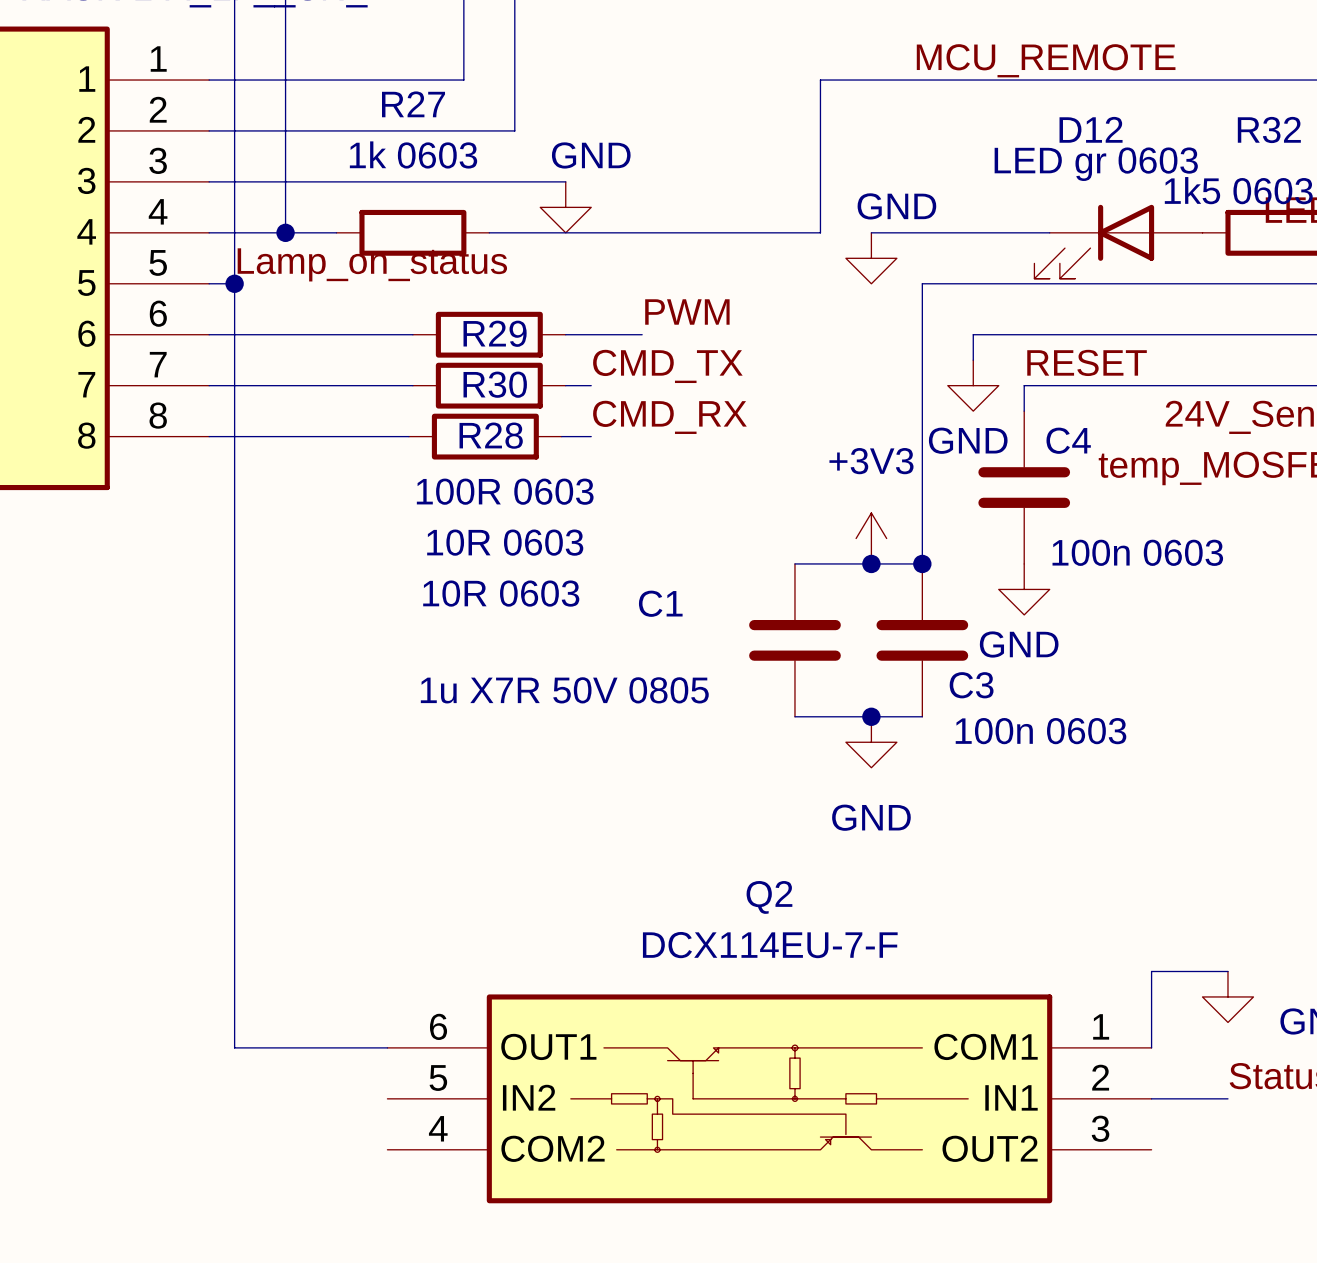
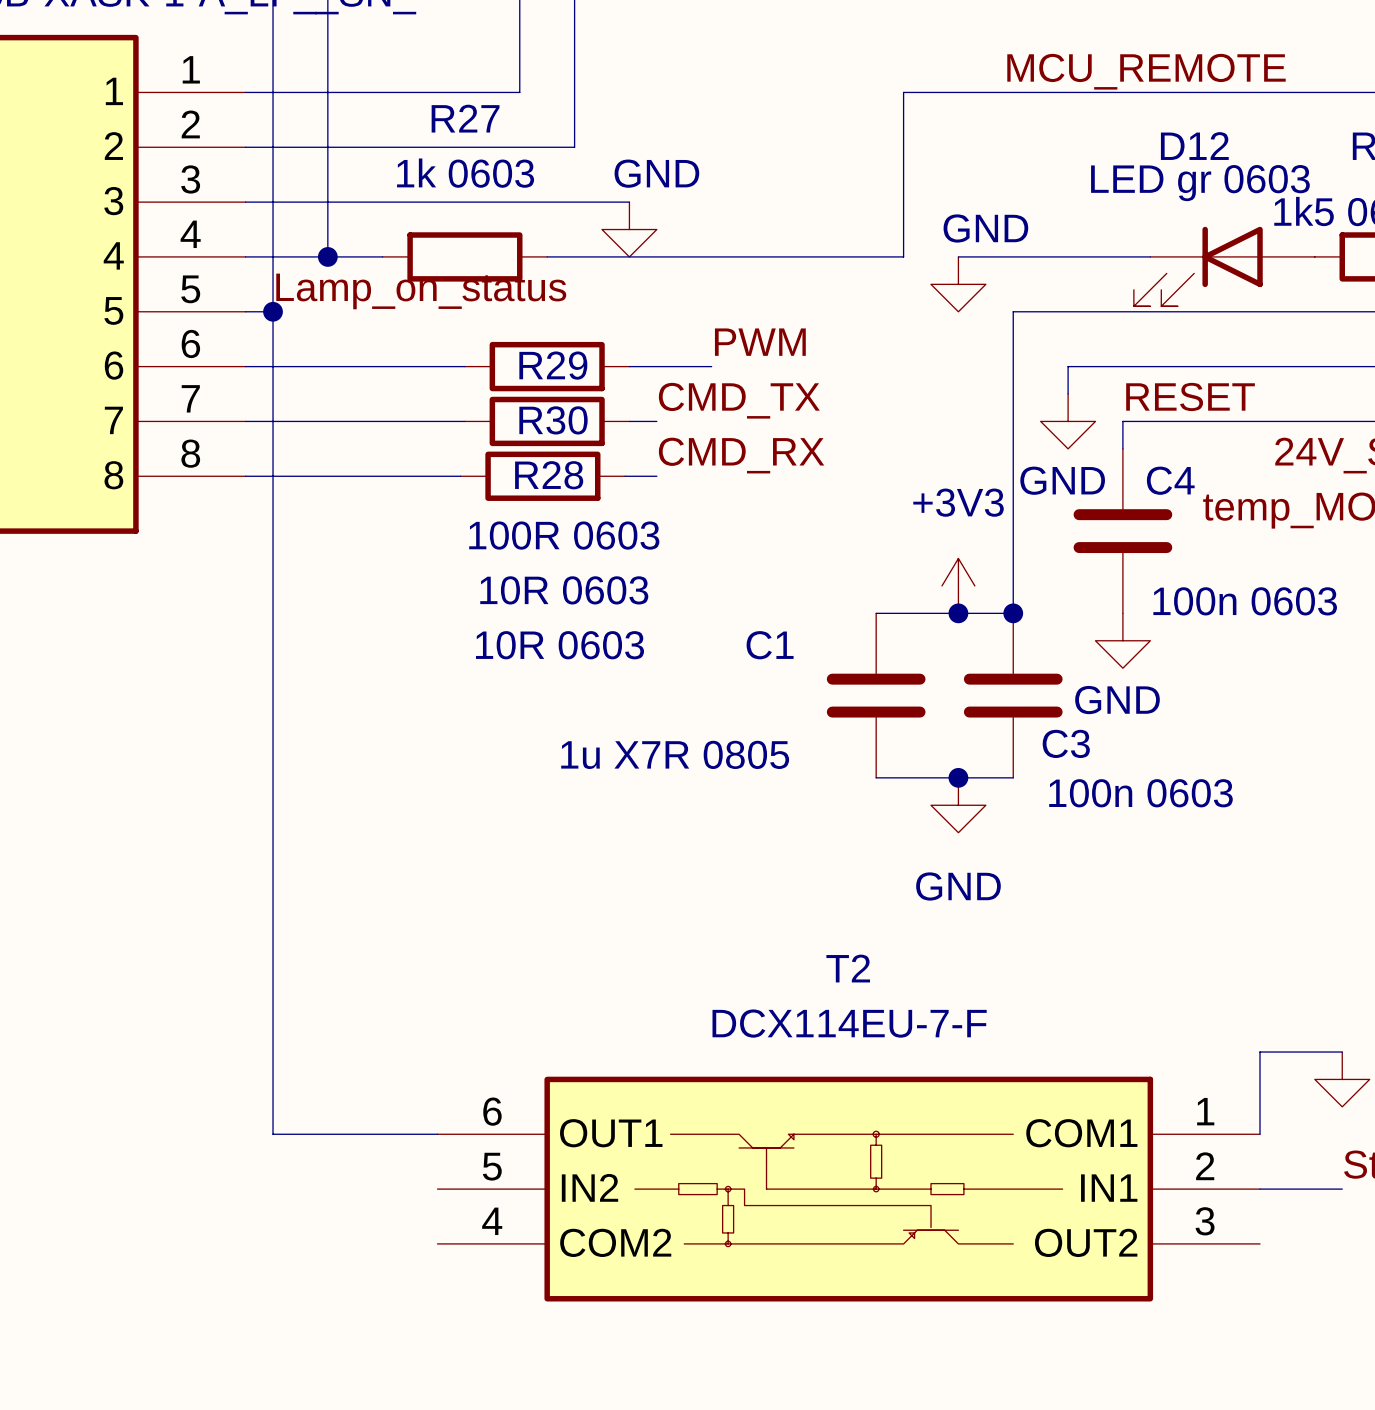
C1 name position: C1 (660, 603) -> C1 (770, 645)
C1 value: 1u X7R 50V 0805 (564, 690) -> 1u X7R 0805 (675, 754)
Q2 name: Q2 (769, 897) -> T2 (848, 968)

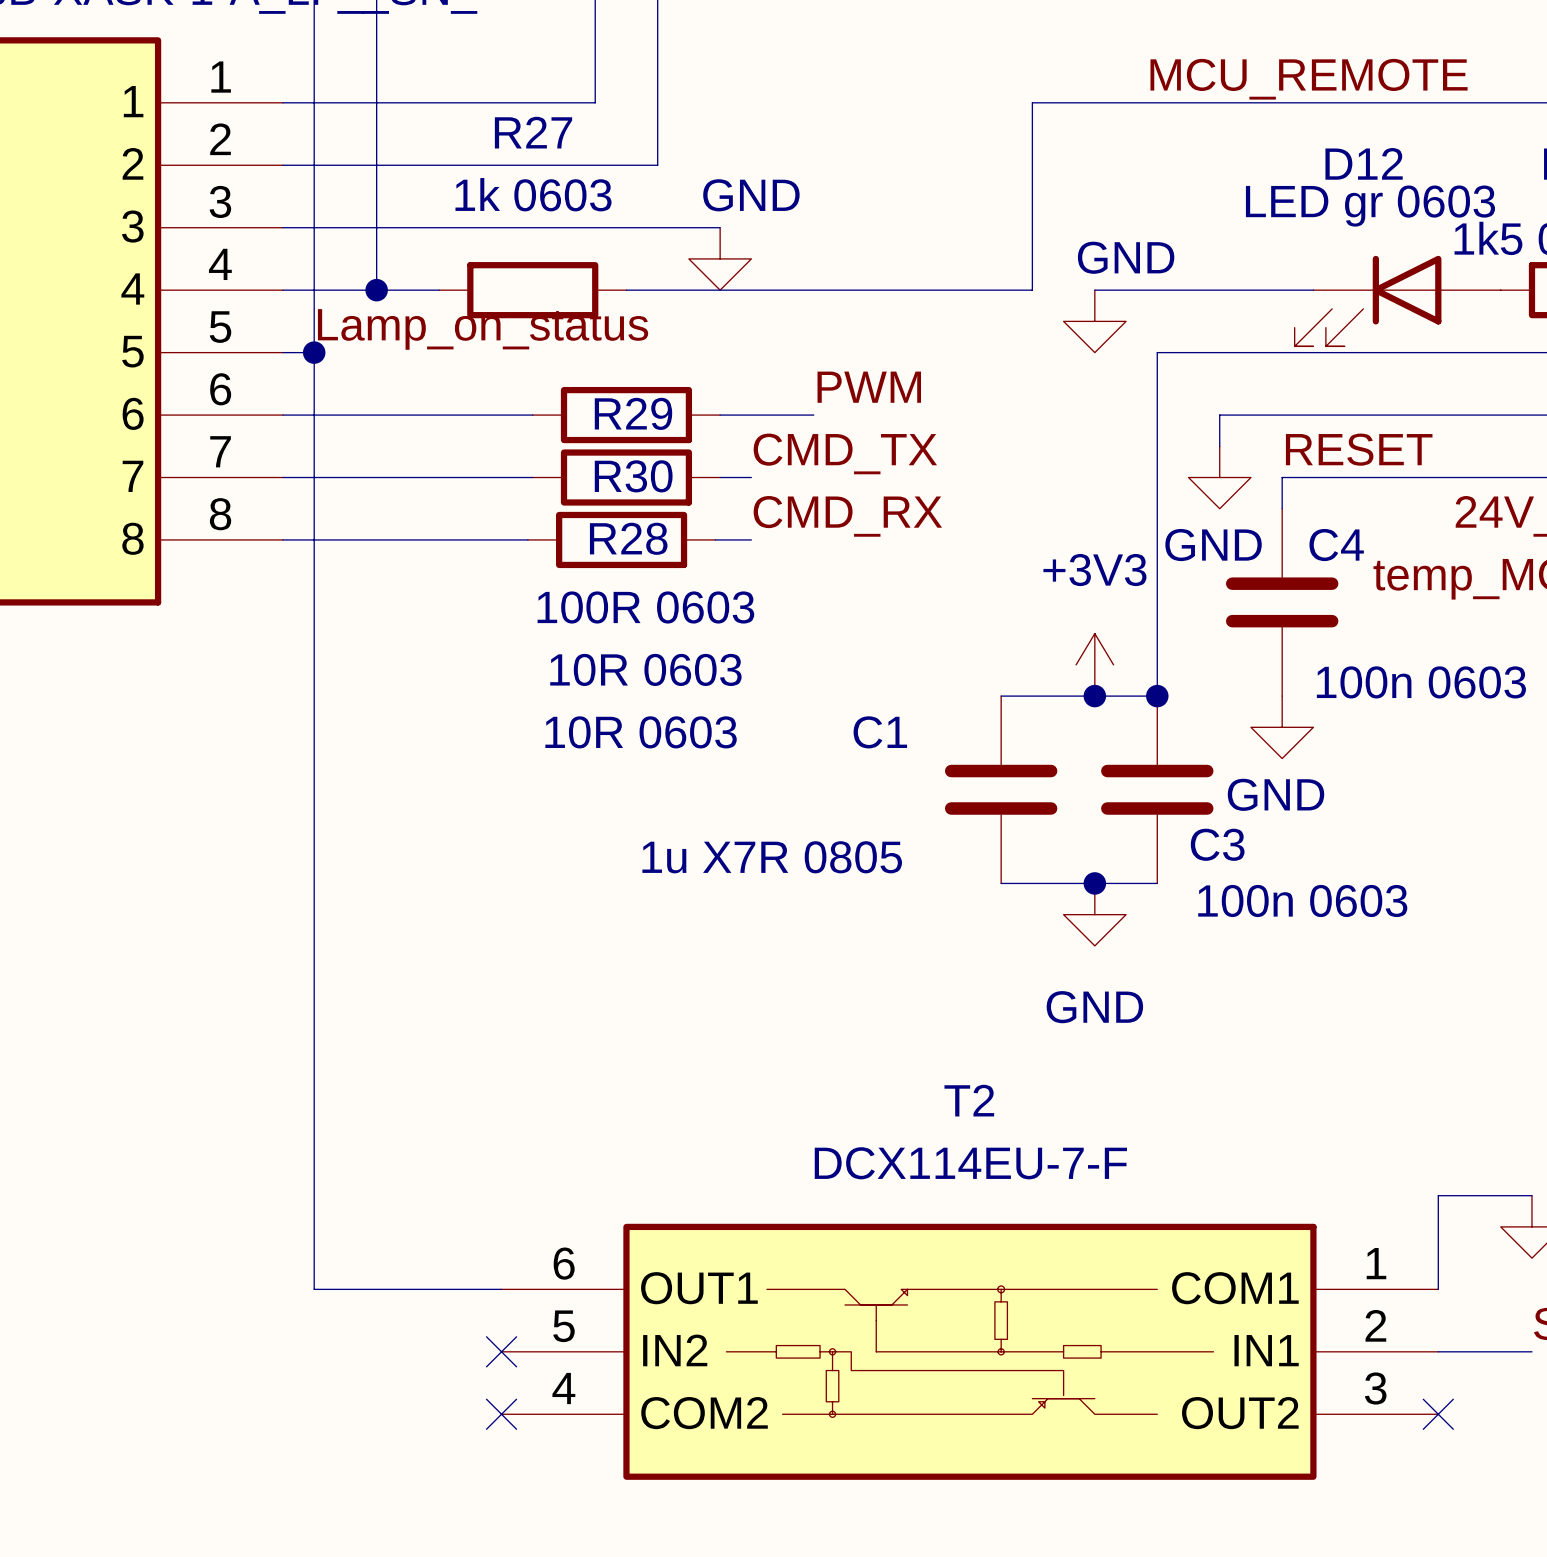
no-connect mark: none -> (501, 1351)
no-connect mark: none -> (501, 1414)
no-connect mark: none -> (1438, 1414)

